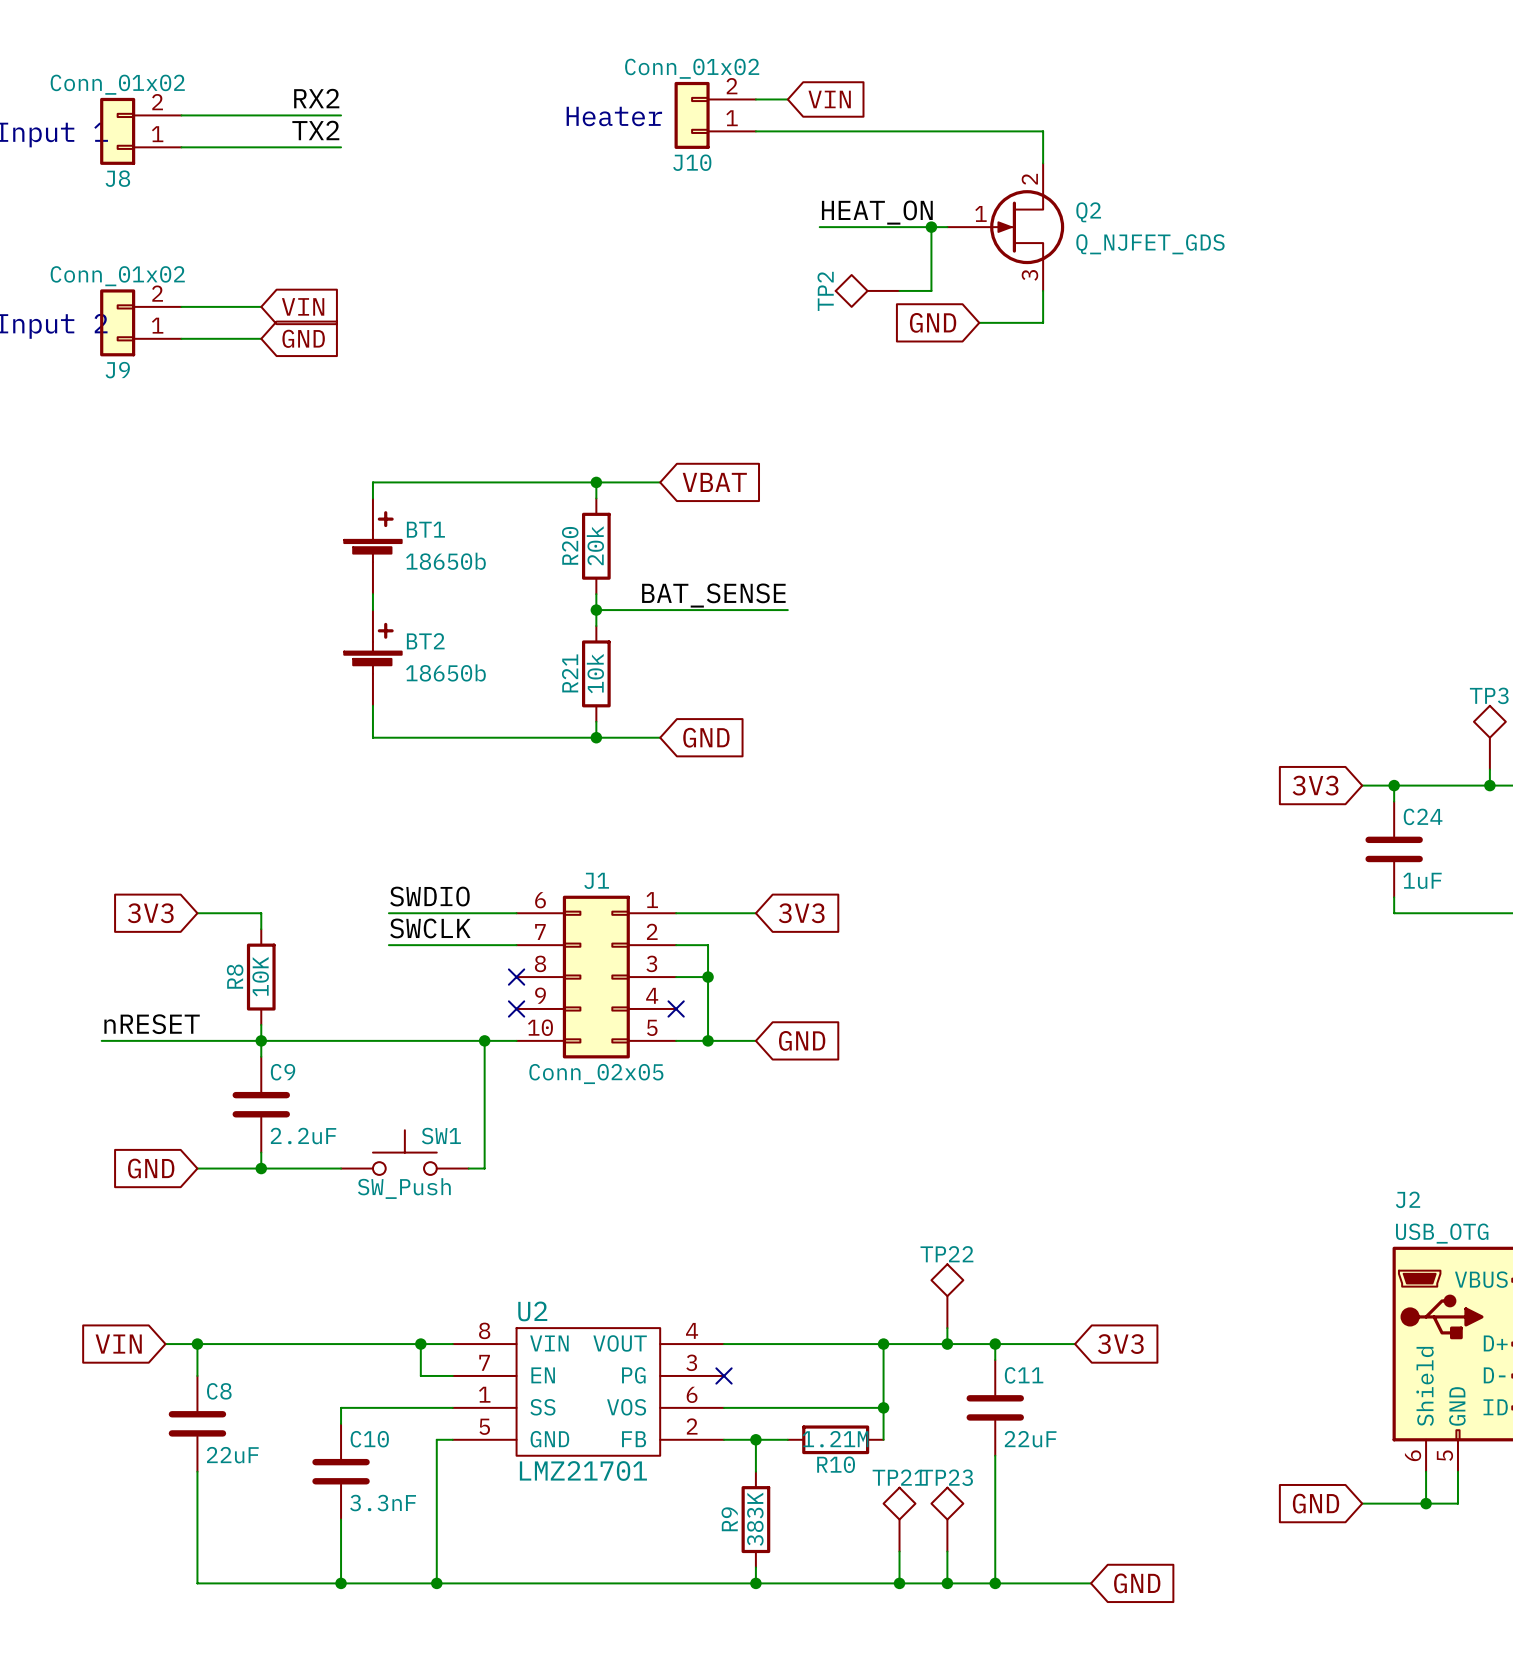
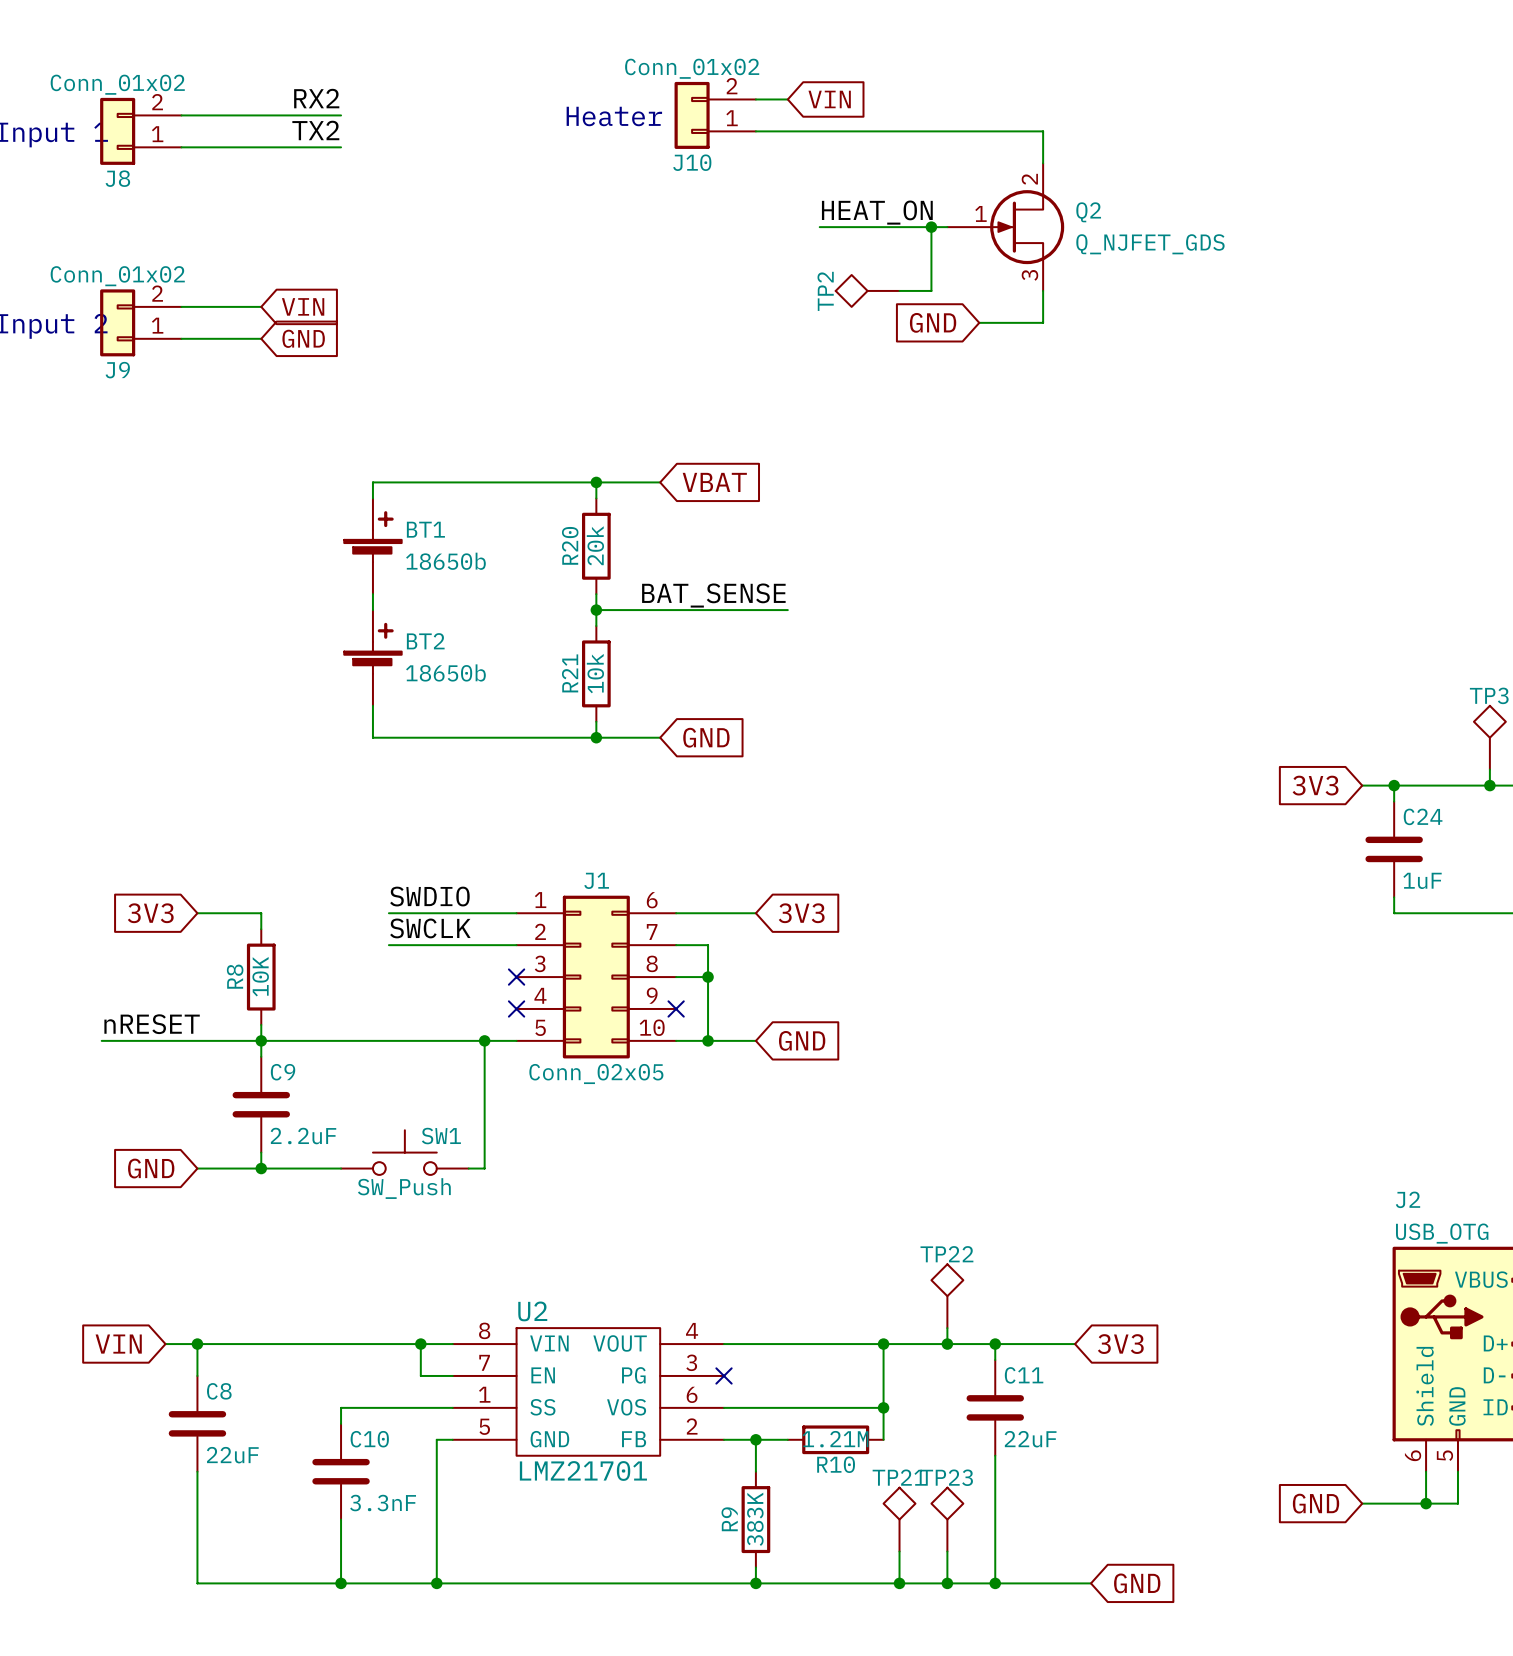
J1 flip: as is (596, 977) -> left-right (596, 977)

